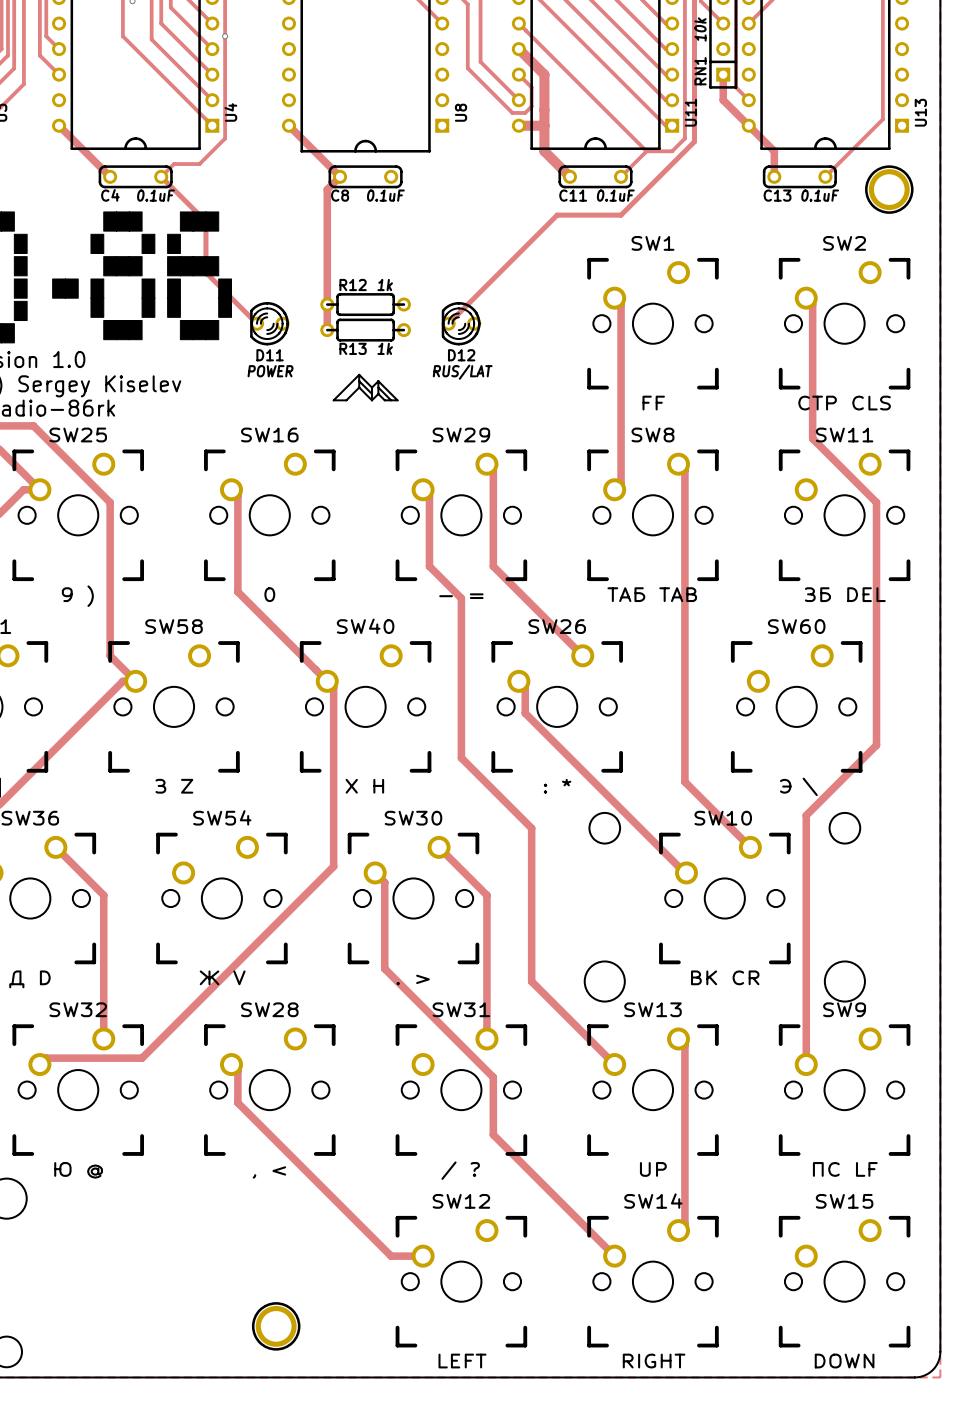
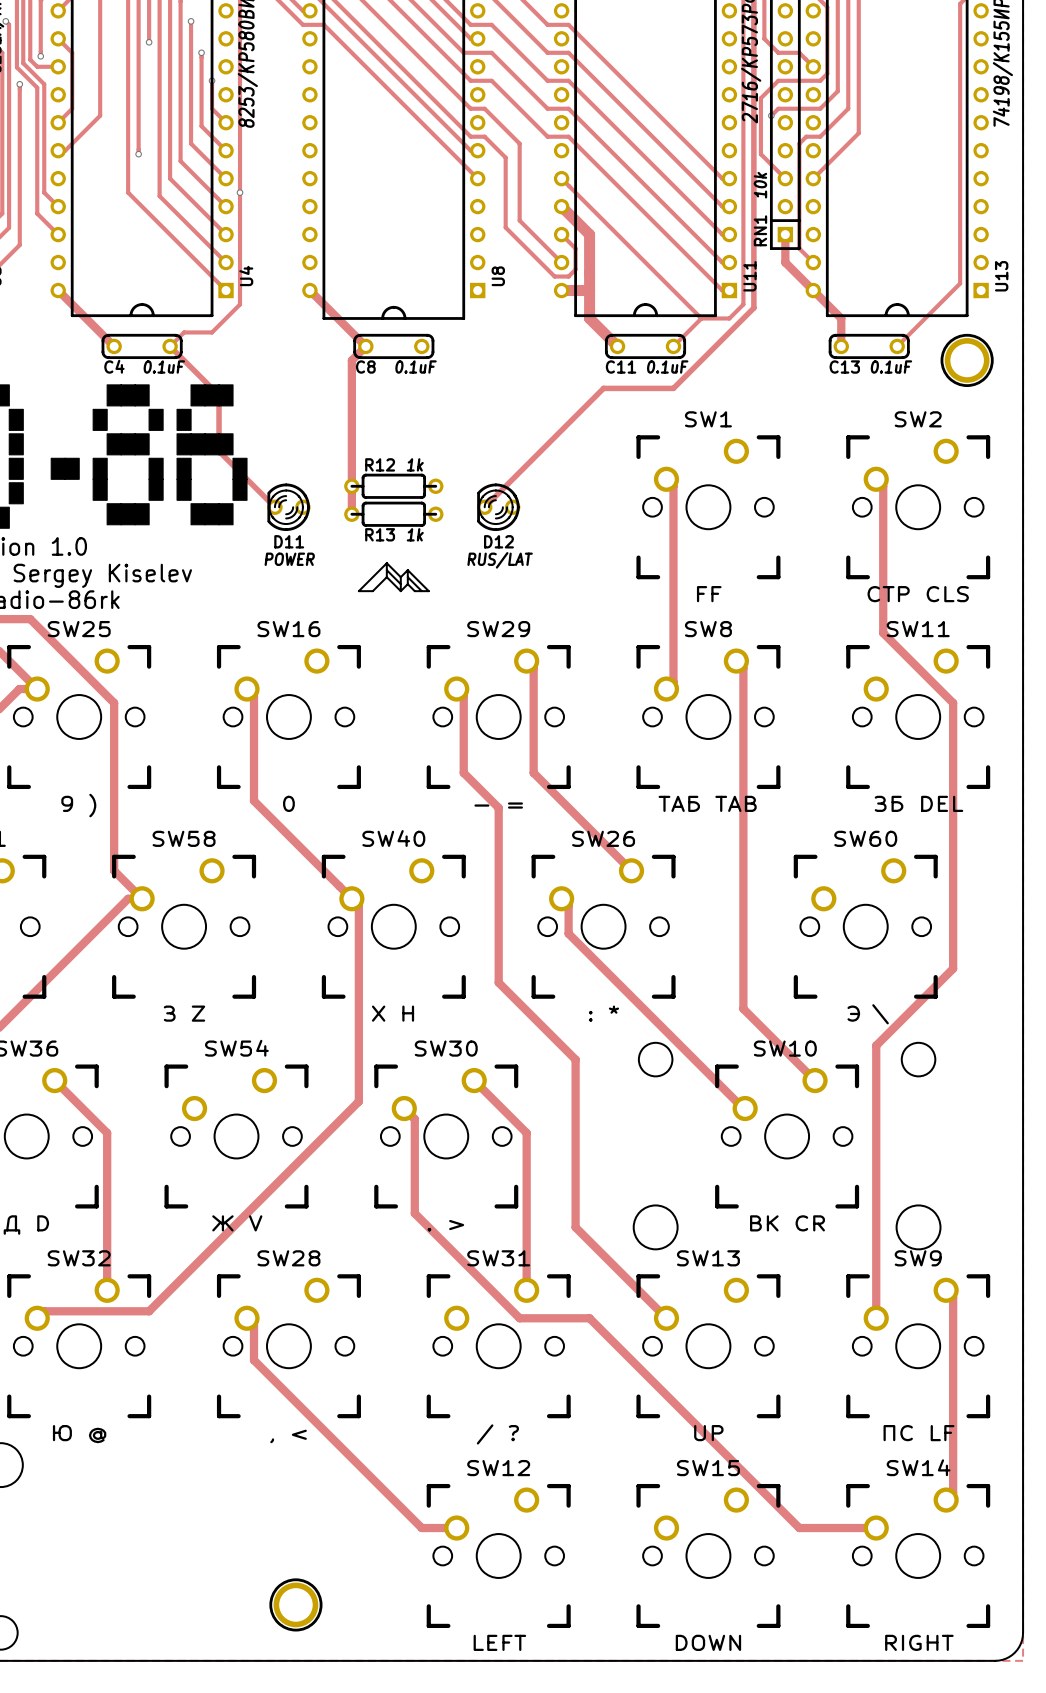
track: (678, 1038) (684, 1045) (684, 1224) (678, 1230) -> (946, 1290) (953, 1297) (953, 1493) (946, 1500)
track: (480, 1064) (493, 1077) (493, 1134) (614, 1256) -> (519, 1318) (589, 1318) (799, 1528) (876, 1528)
SW14 name: SW14 (653, 1201) -> SW15 (708, 1468)
SW15 name: SW15 (844, 1201) -> SW14 (918, 1467)
SW14 value: RIGHT (654, 1361) -> DOWN (708, 1642)
SW15 value: DOWN (844, 1361) -> RIGHT (919, 1642)

